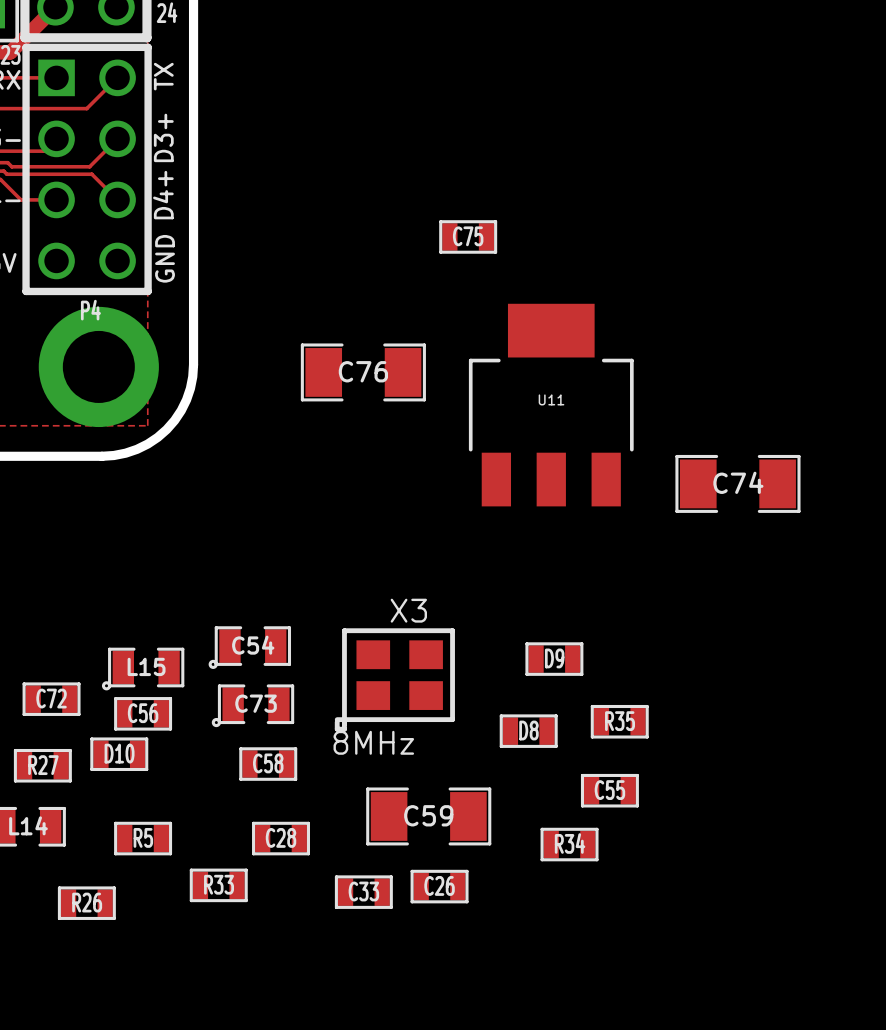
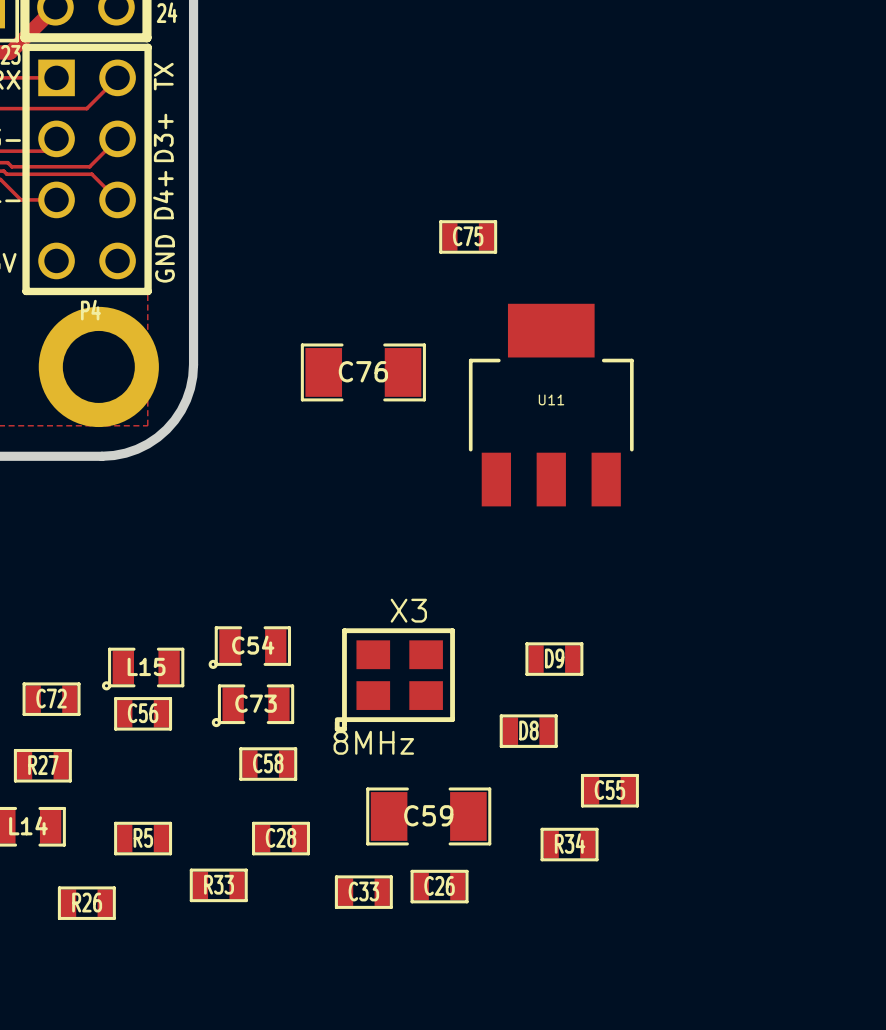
C74: (737, 483) -> none
R35: (619, 721) -> none
D10: (119, 754) -> none

